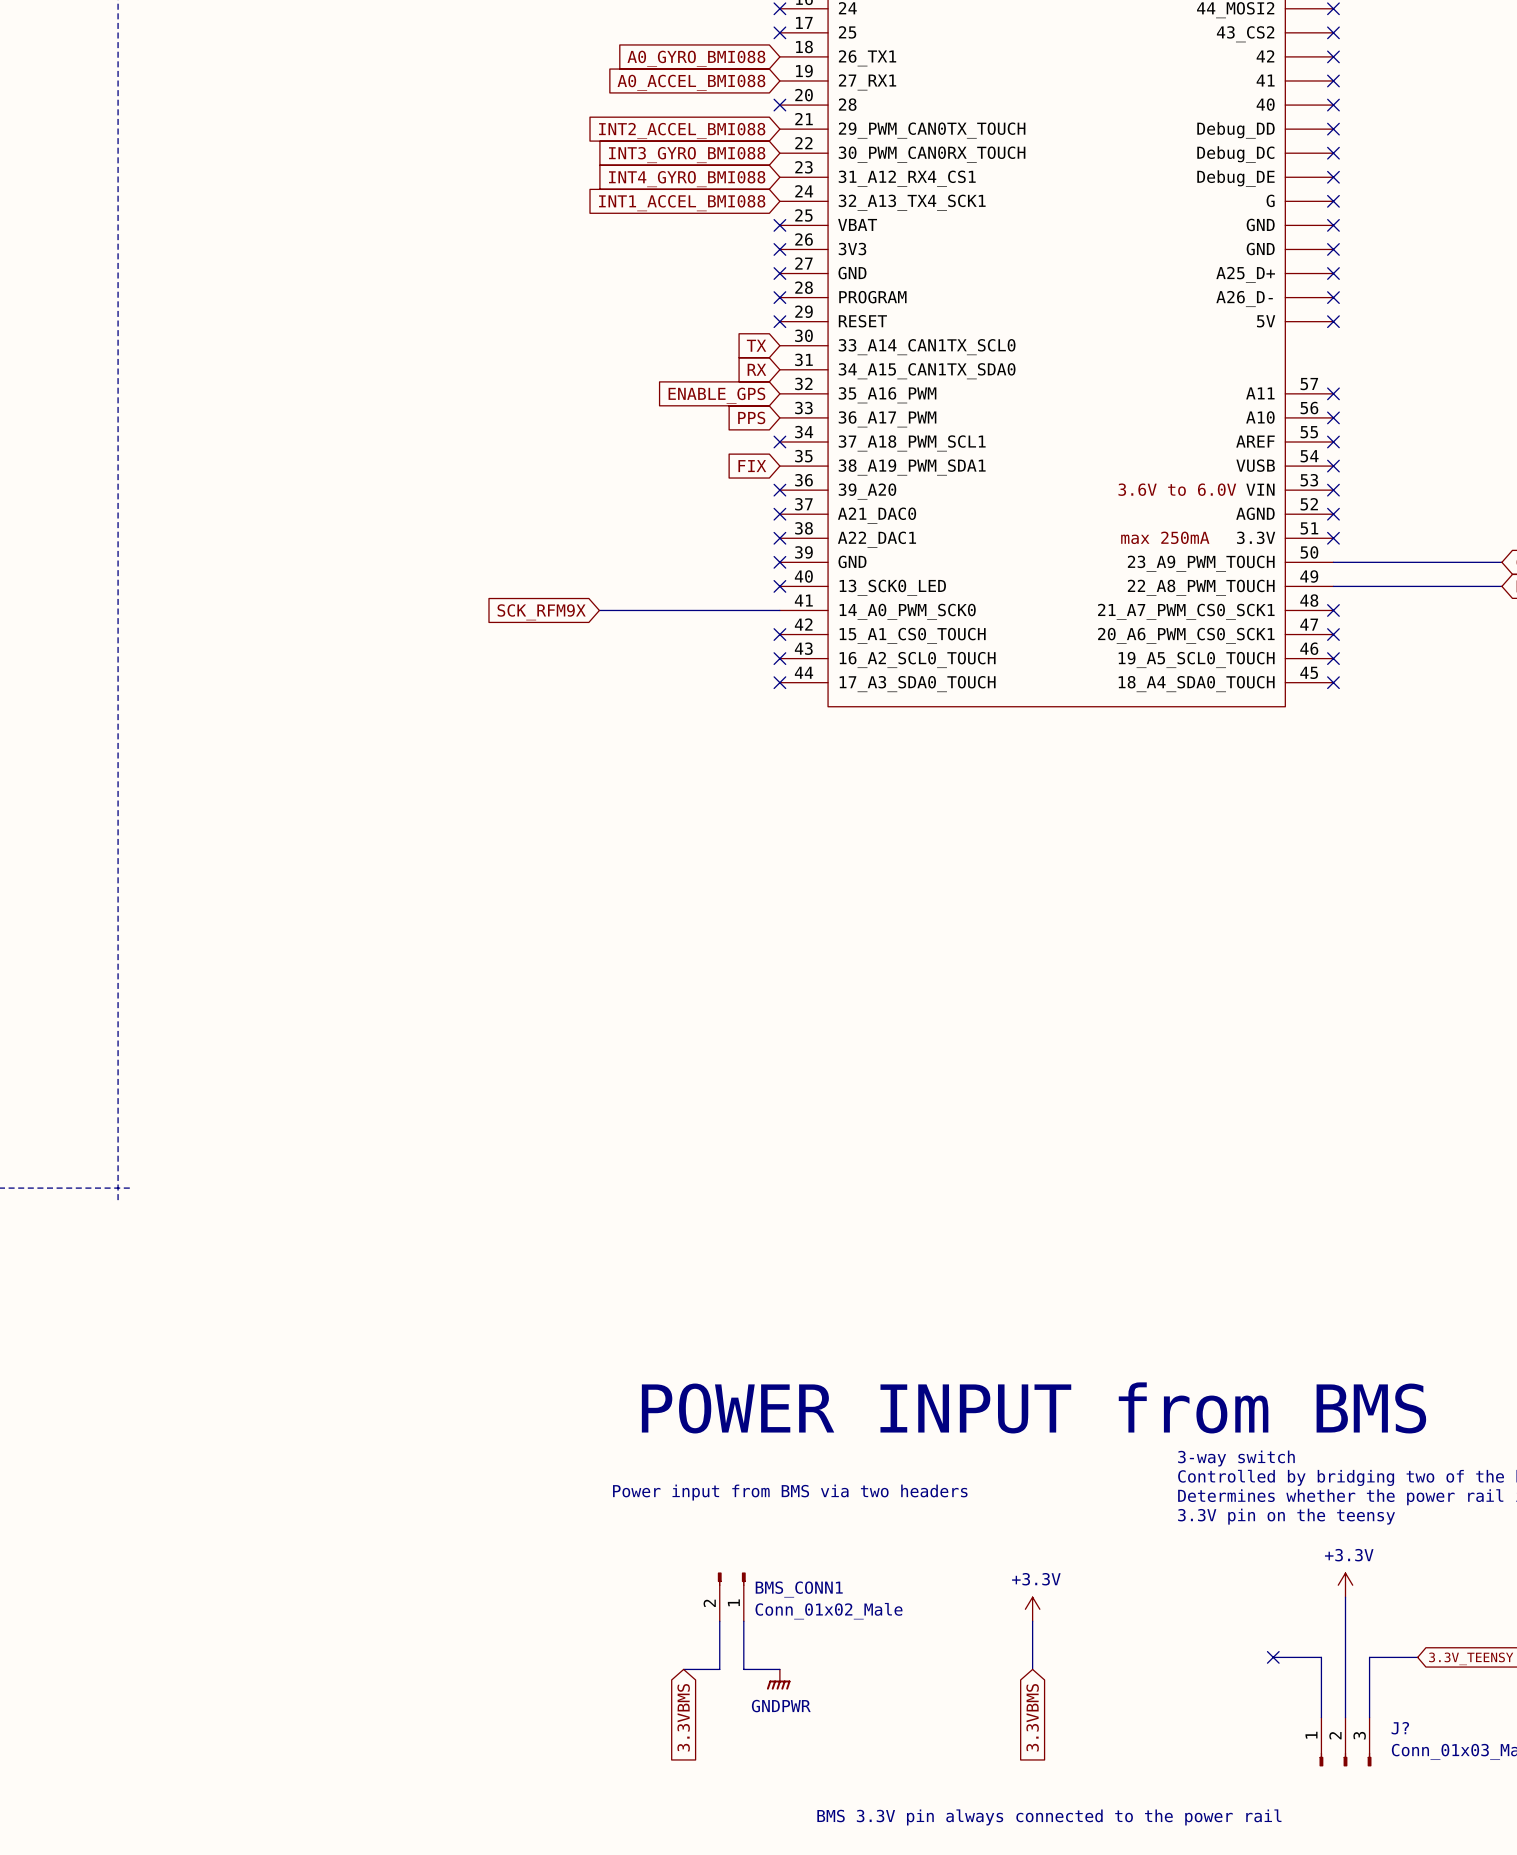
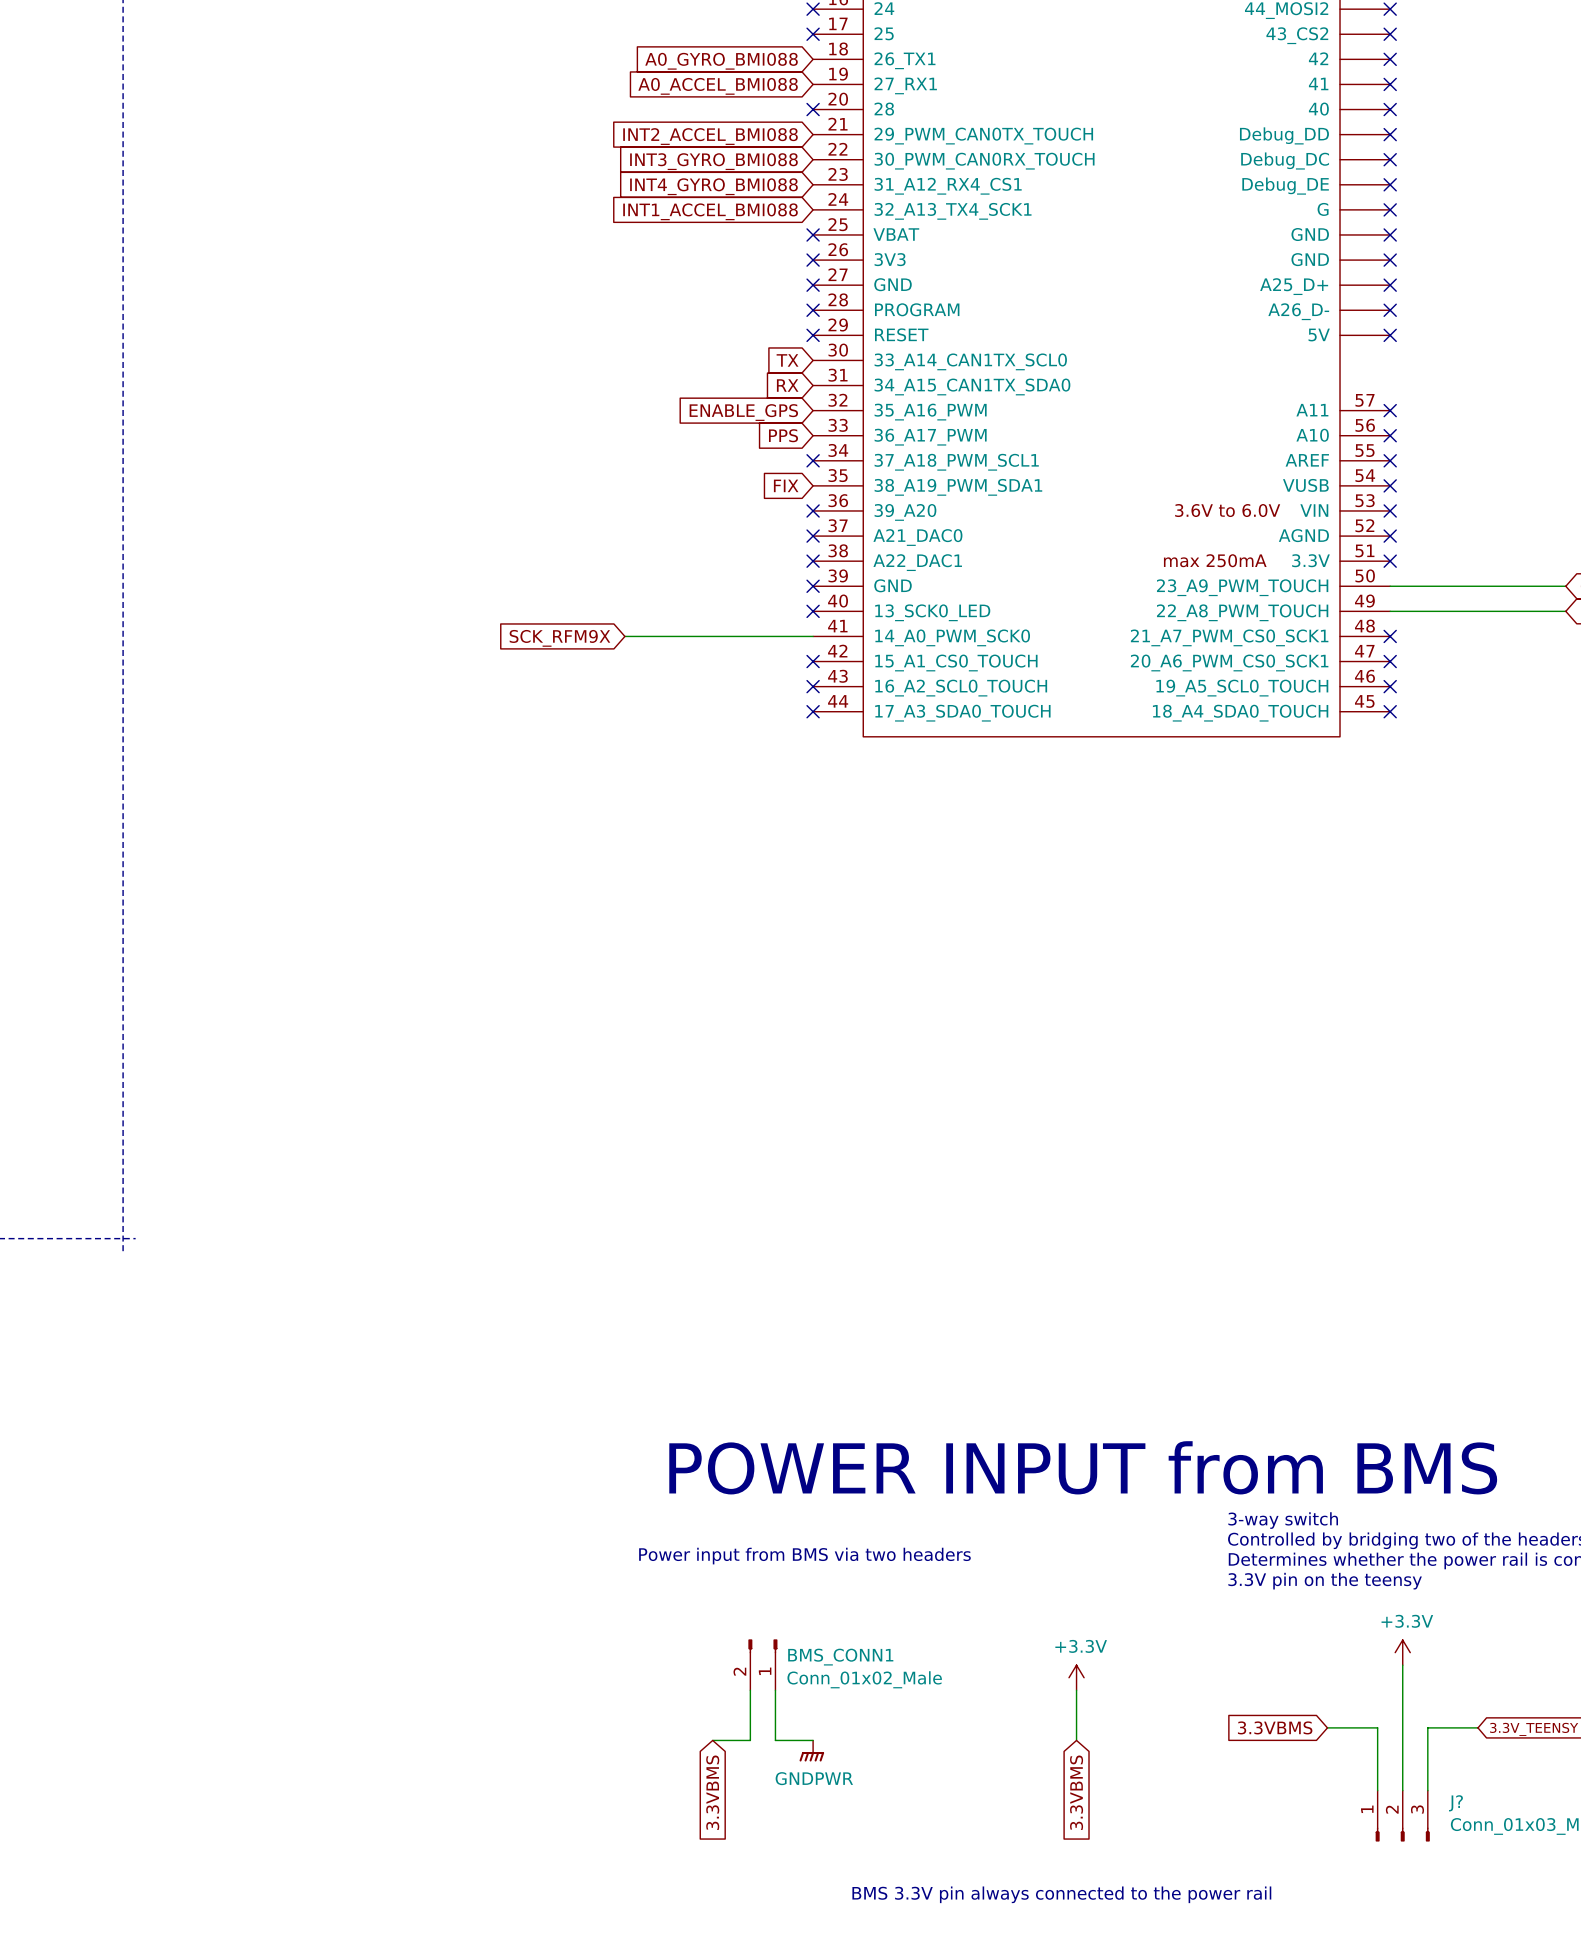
global label: none -> 3.3VBMS (1275, 1727)
no-connect mark: (1273, 1657) -> none

